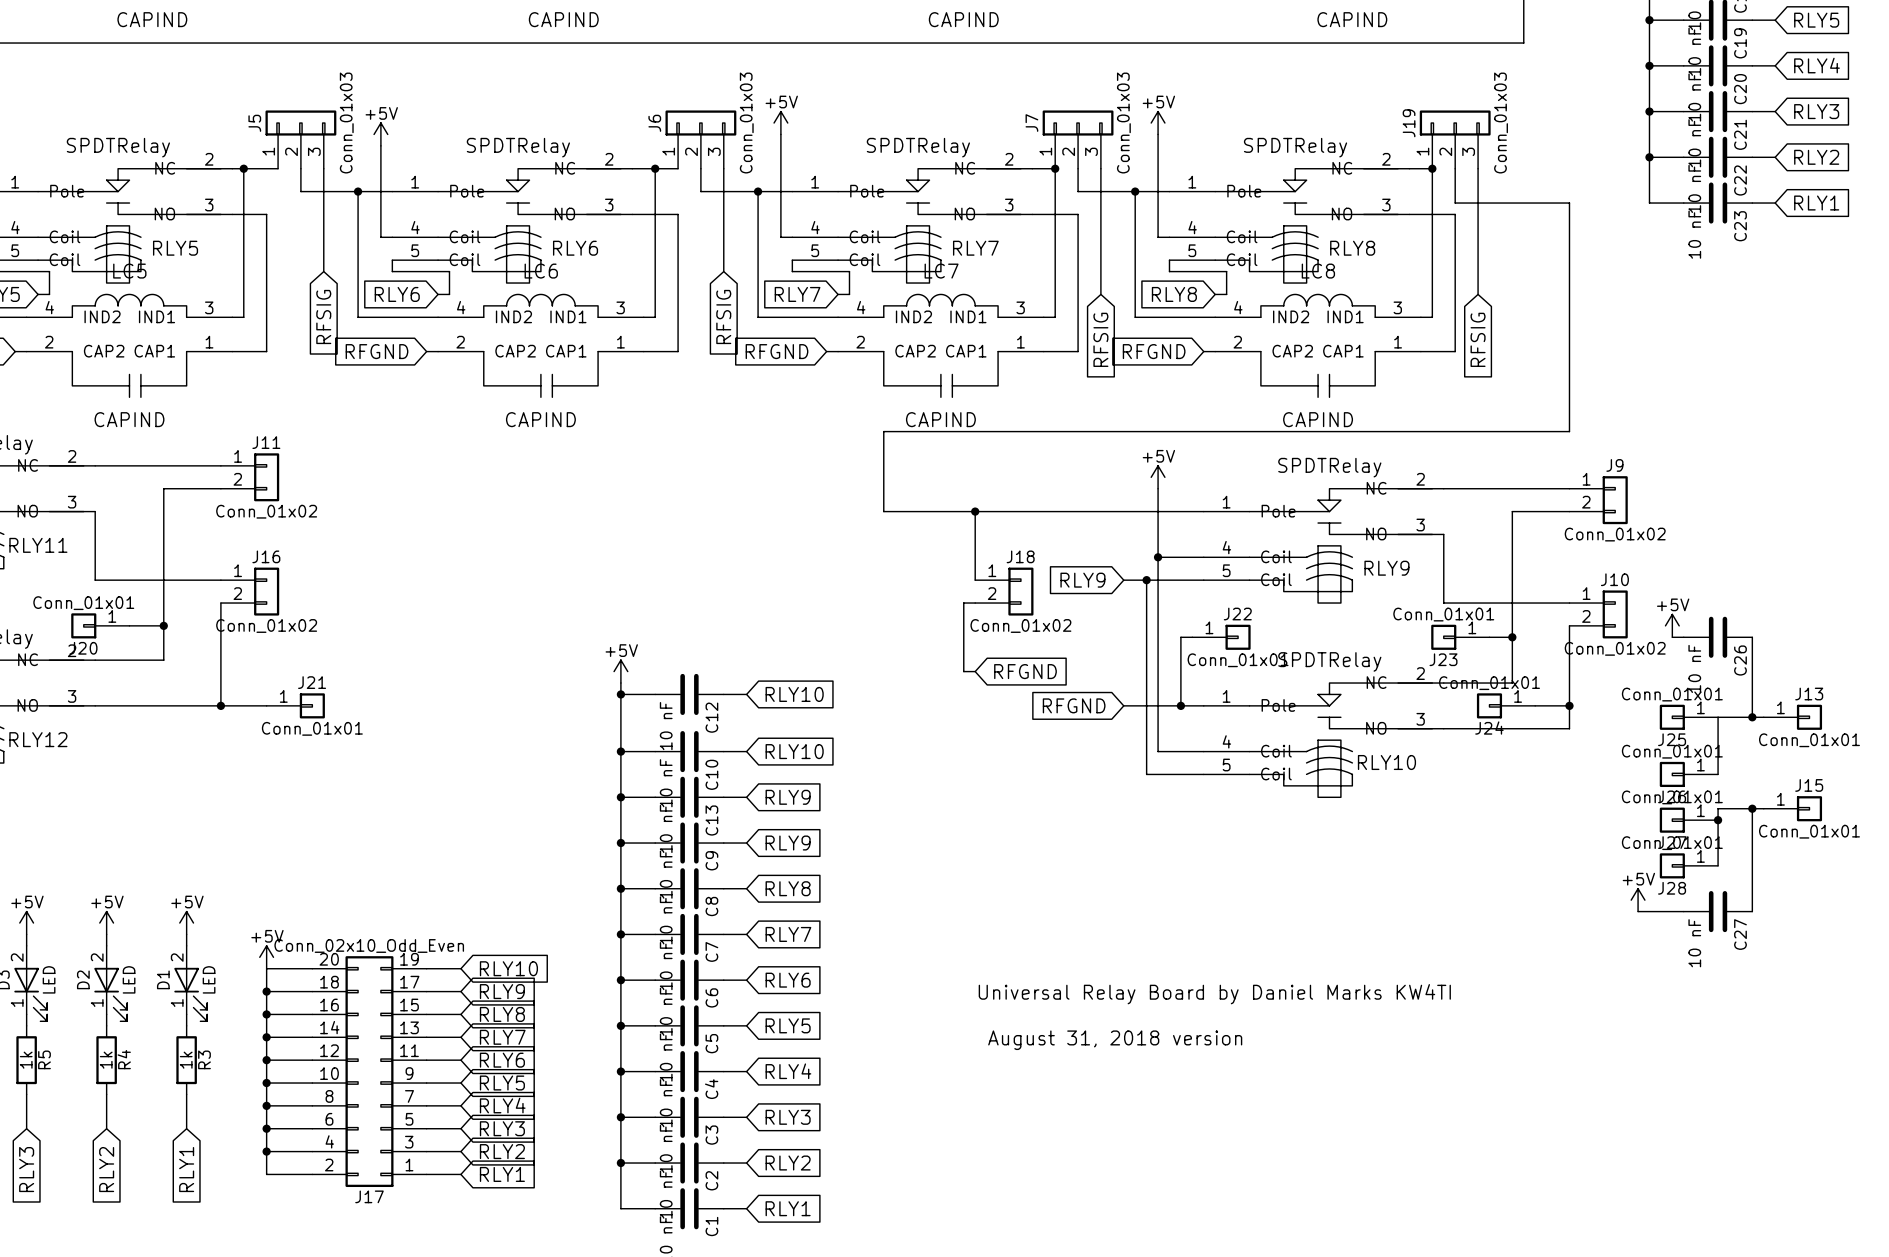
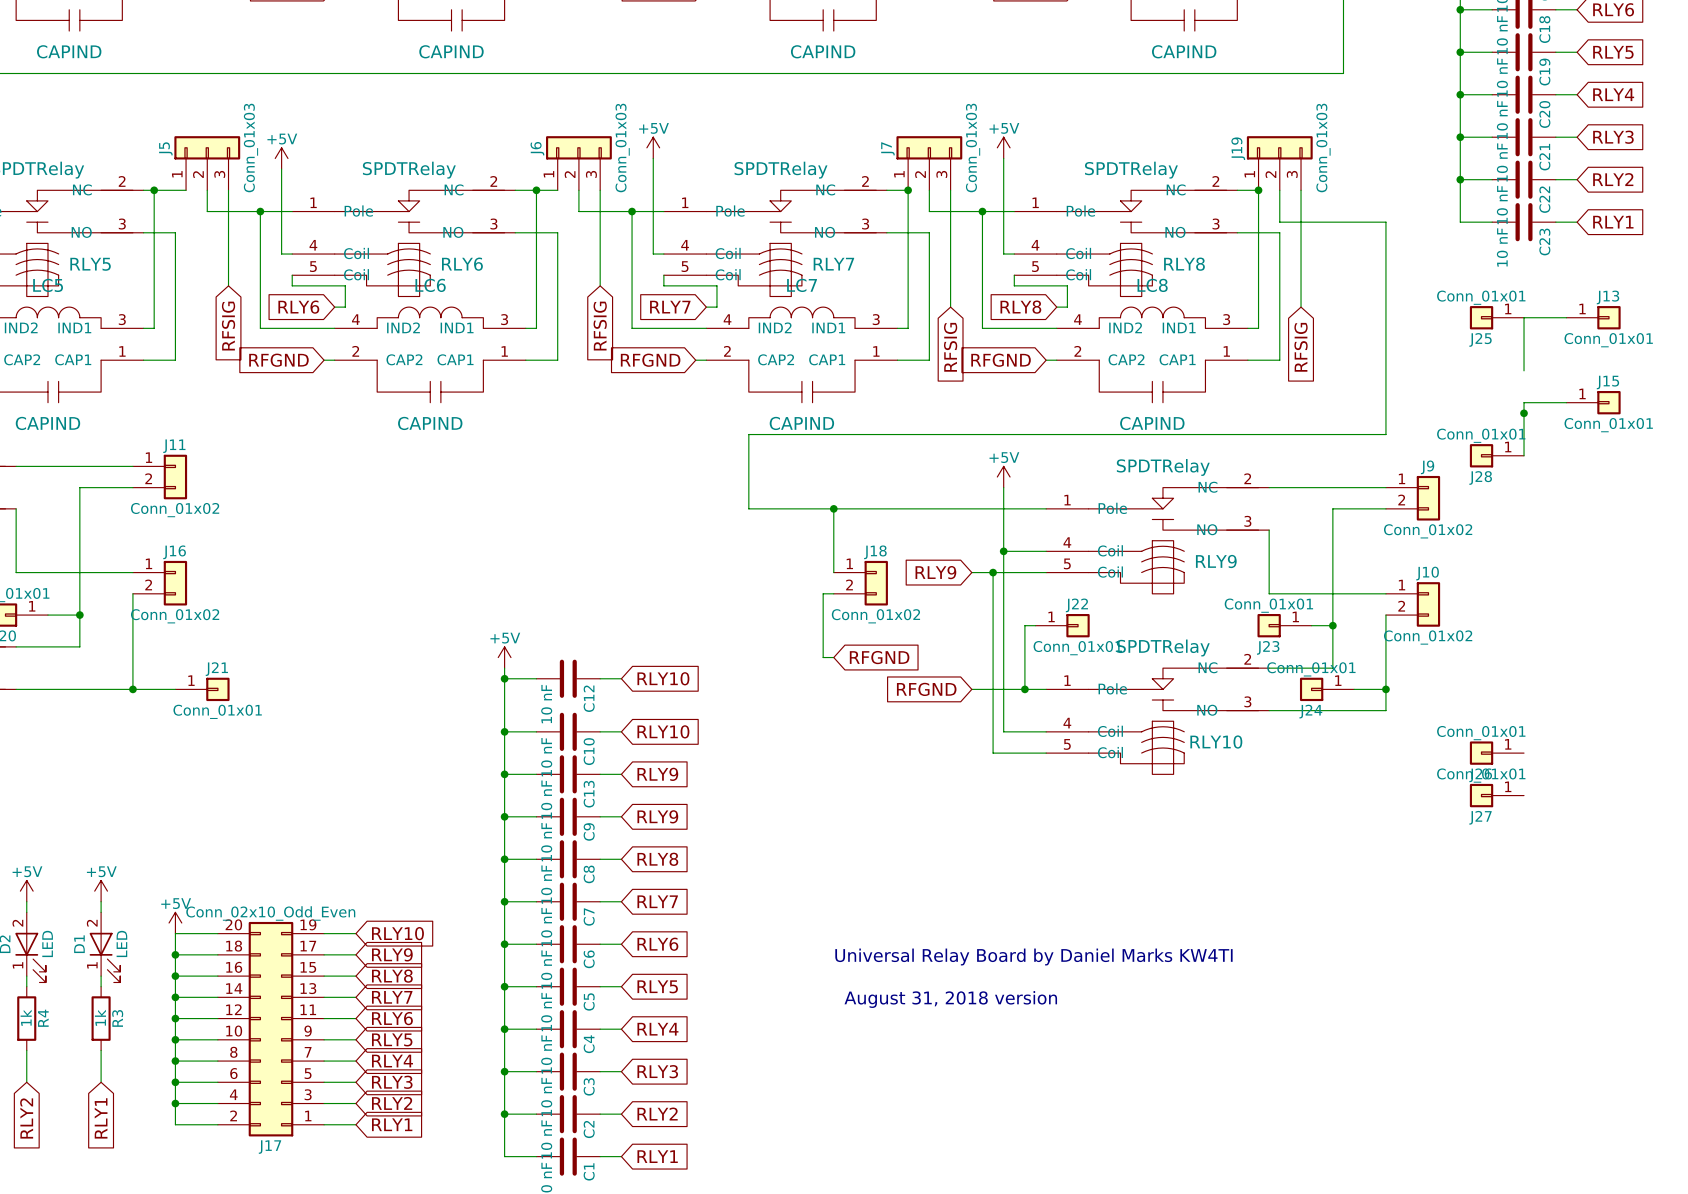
wire: none -> (1566, 317) (1524, 317) (1524, 370)
wire: none -> (1566, 402) (1524, 402) (1524, 455)
junction: none -> (1524, 413)
power symbol: +5V (1672, 625) -> none
wire: (1672, 637) (1683, 637) -> none
C26: 10 nF (1718, 637) -> none
wire: (1752, 637) (1752, 717) -> none
J25 position: (1688, 717) -> (1496, 317)
junction: (1752, 717) -> none
wire: (1763, 717) (1718, 717) (1718, 774) -> none
J13 position: (1792, 717) -> (1593, 317)
wire: (1752, 808) (1752, 911) -> none
junction: (1752, 808) -> none
wire: (1763, 808) (1718, 808) (1718, 865) -> none
J15 position: (1792, 808) -> (1593, 402)
junction: (1718, 820) -> none
J28 position: (1688, 865) -> (1496, 455)
power symbol: +5V (1638, 900) -> none
wire: (1638, 911) (1683, 911) -> none
C27: 10 nF (1718, 911) -> none

